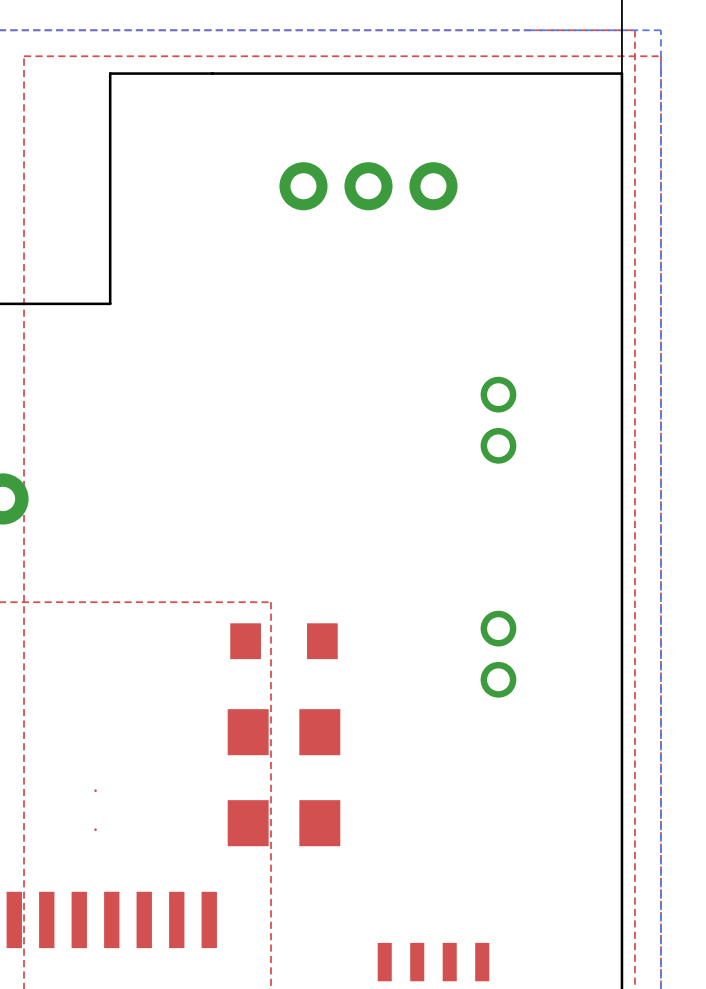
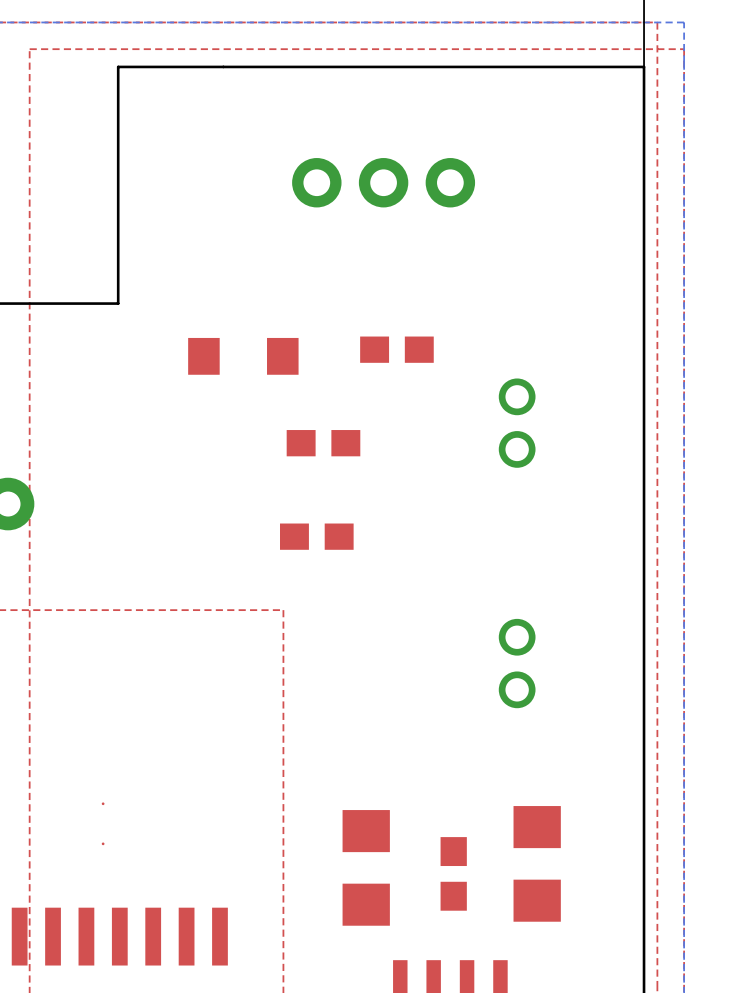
part: none -> (396, 349)
part: none -> (323, 443)
part: none -> (316, 536)
part position: (283, 641) -> (243, 356)
part: (283, 732) -> none
part: (283, 823) -> none
part: none -> (537, 863)
part: none -> (366, 867)
part: none -> (453, 873)

